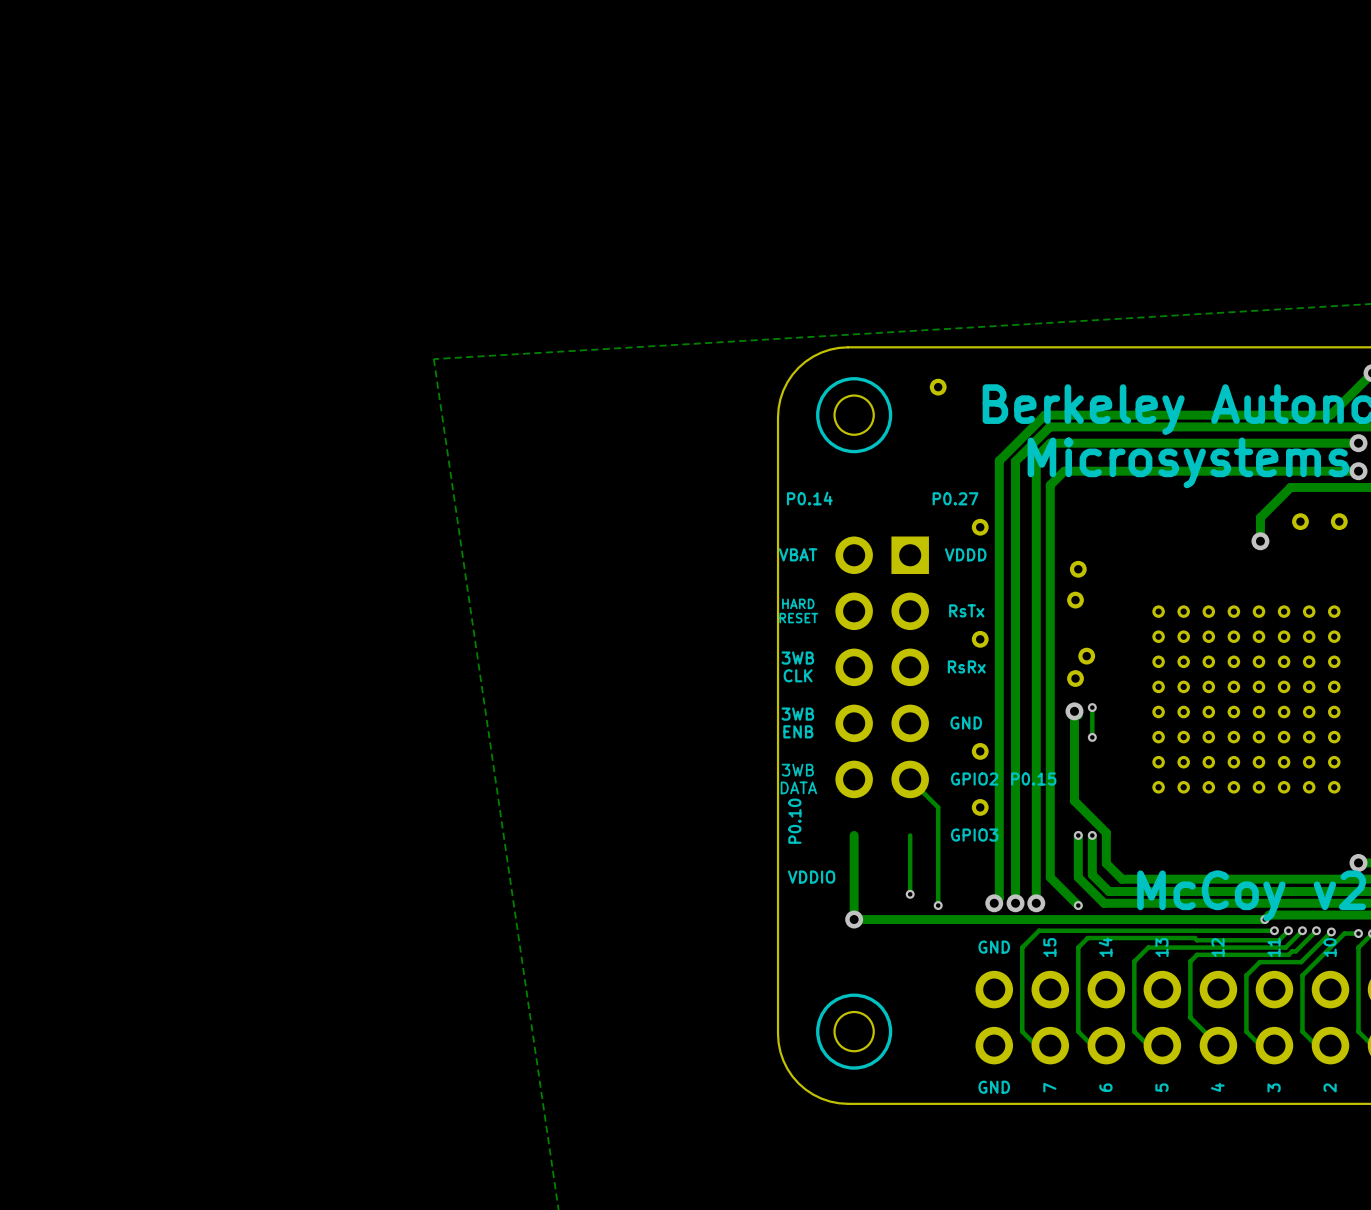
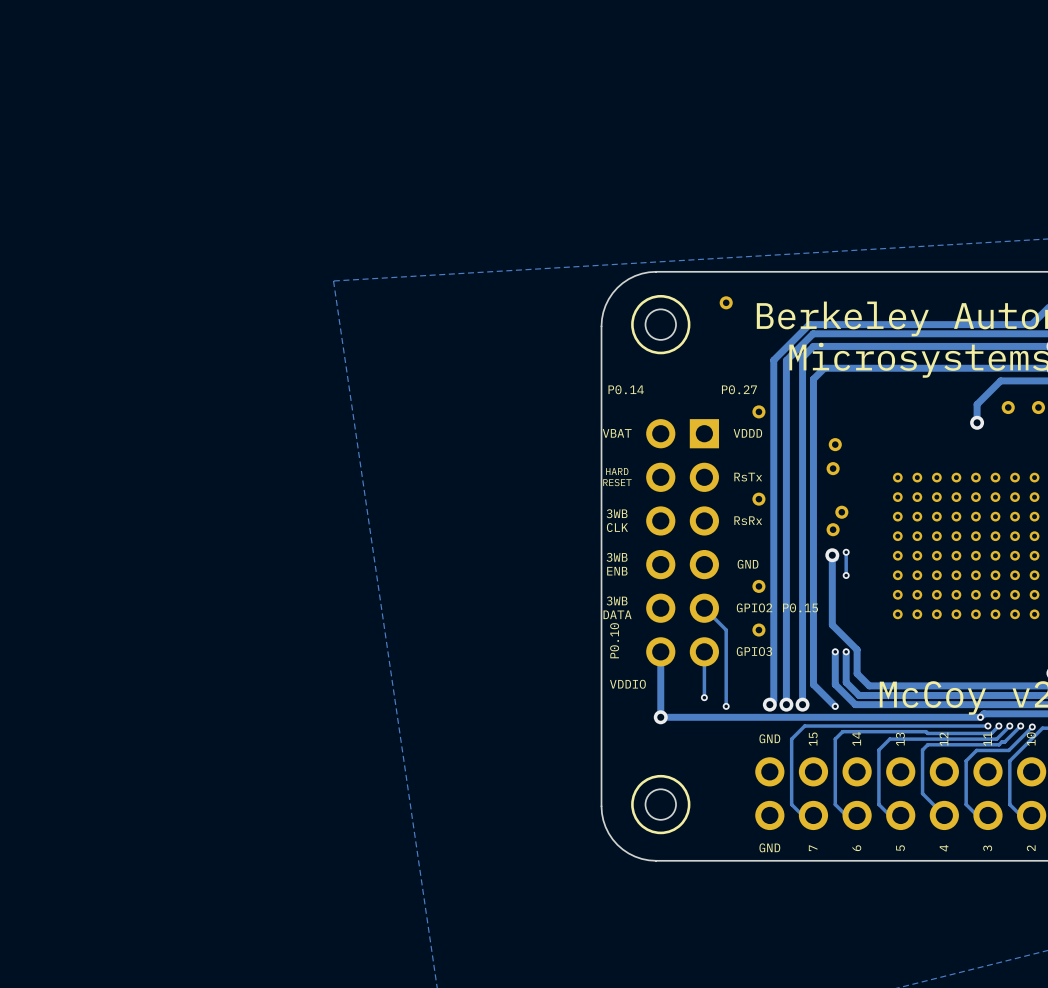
part: none -> (682, 542)

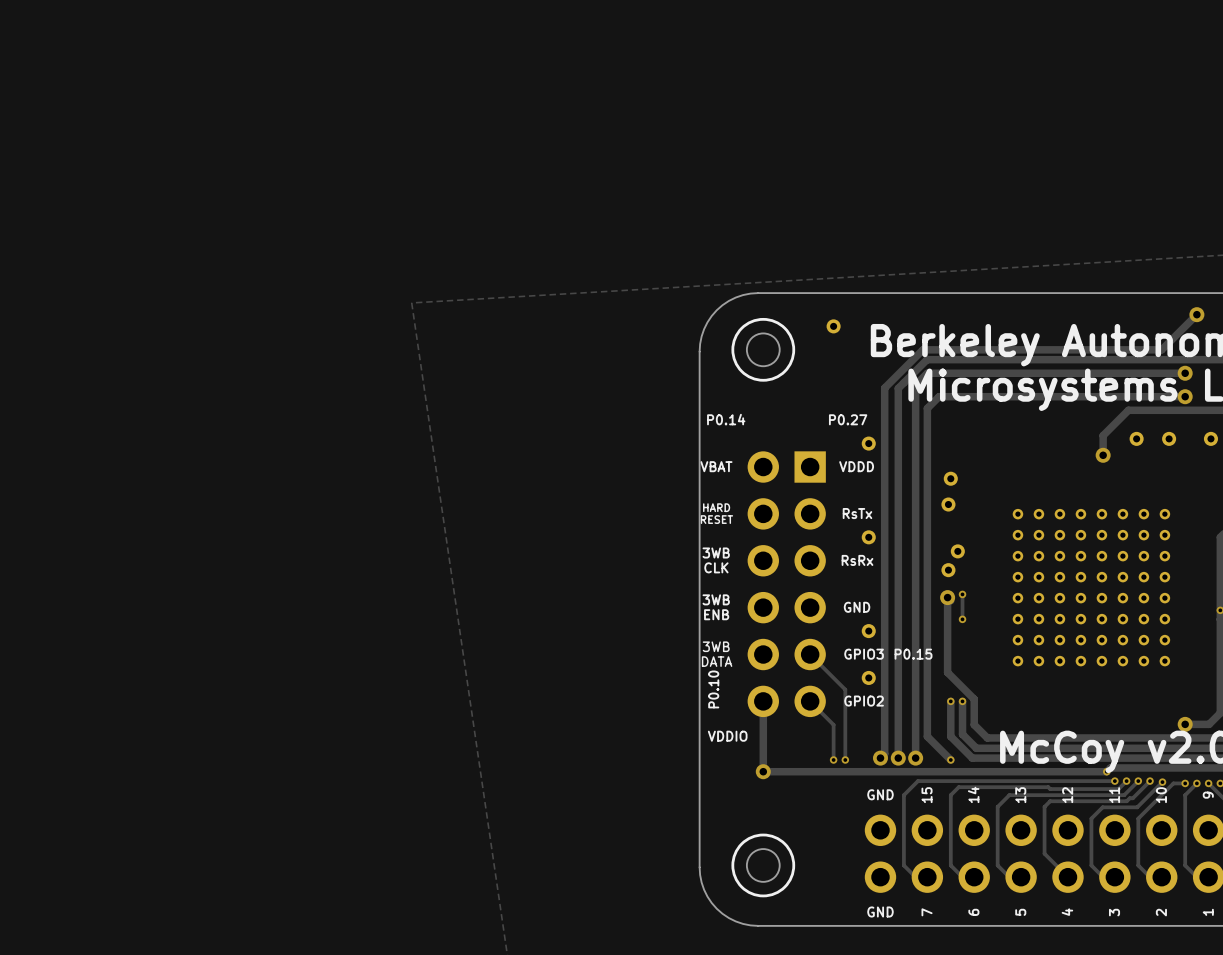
text: GPIO2 (754, 607) -> GPIO3 (864, 654)
track: (726, 630) (726, 673) -> (810, 701) (833, 724)
track: none -> (833, 677) (845, 689) (845, 759)
track: (704, 651) (704, 697) -> none
text: GPIO3 (754, 651) -> GPIO2 (864, 701)
via position: (704, 697) -> (845, 759)

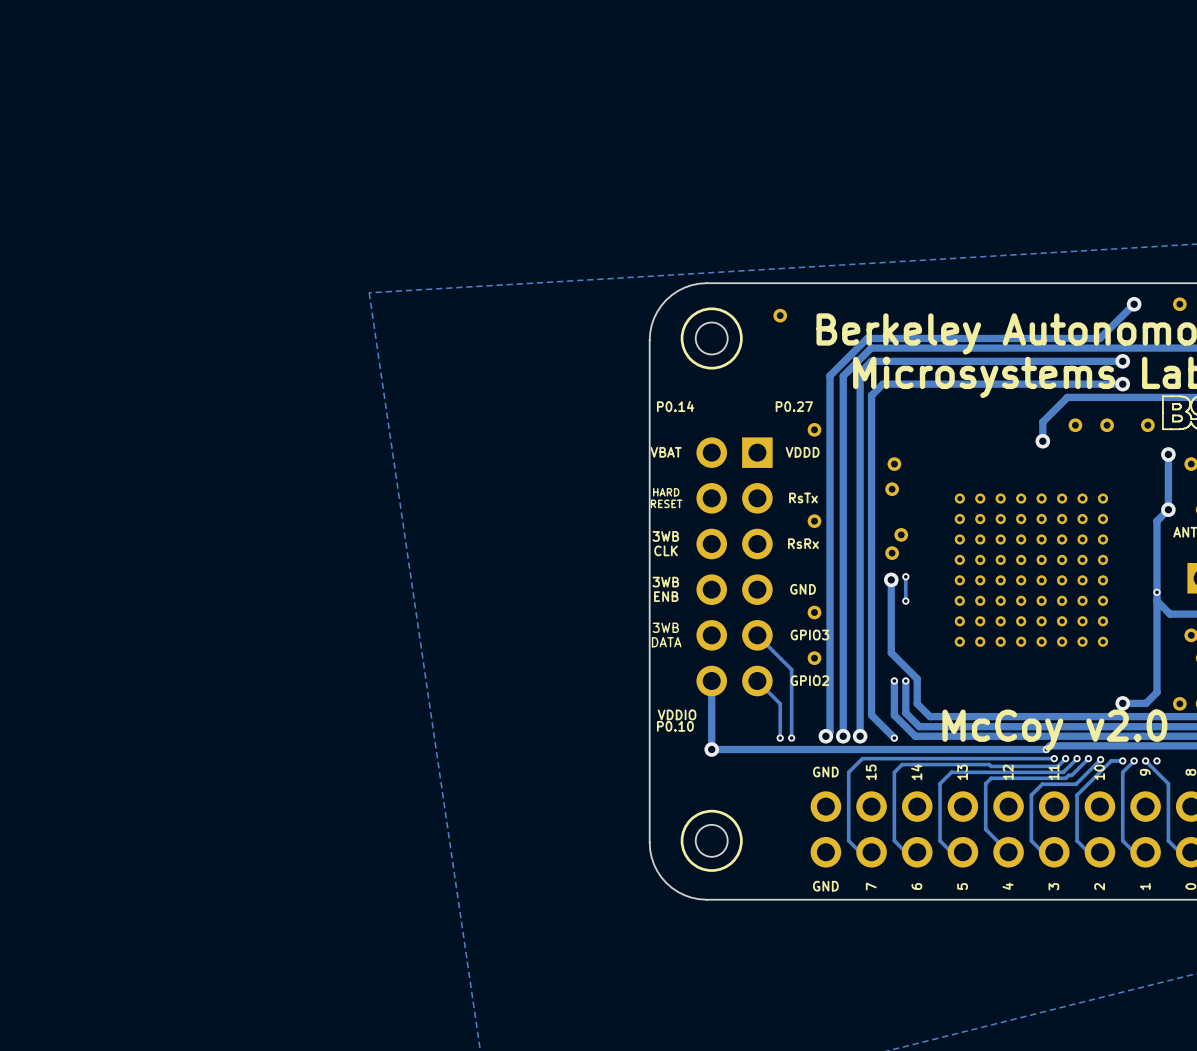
text: P0.15 (913, 654) -> none
text rotation: 0° (713, 689) -> 90° clockwise (675, 726)
text position: P0.10 (713, 689) -> P0.10 (675, 726)

